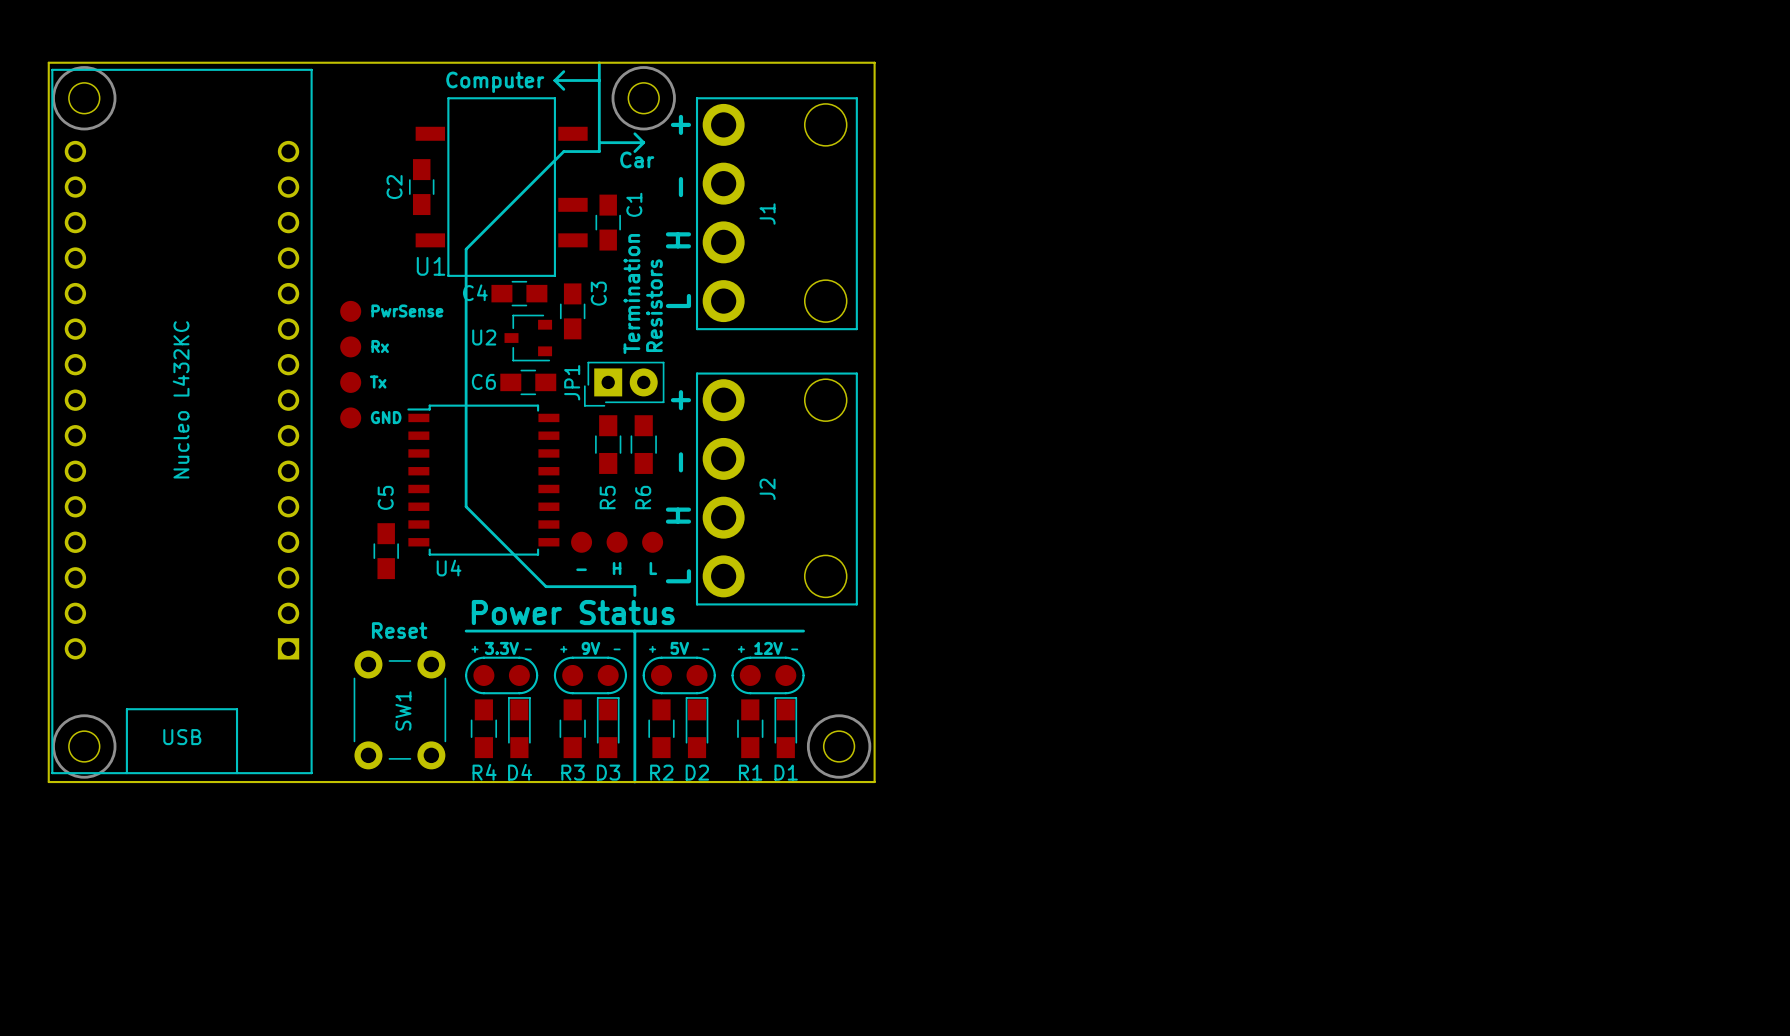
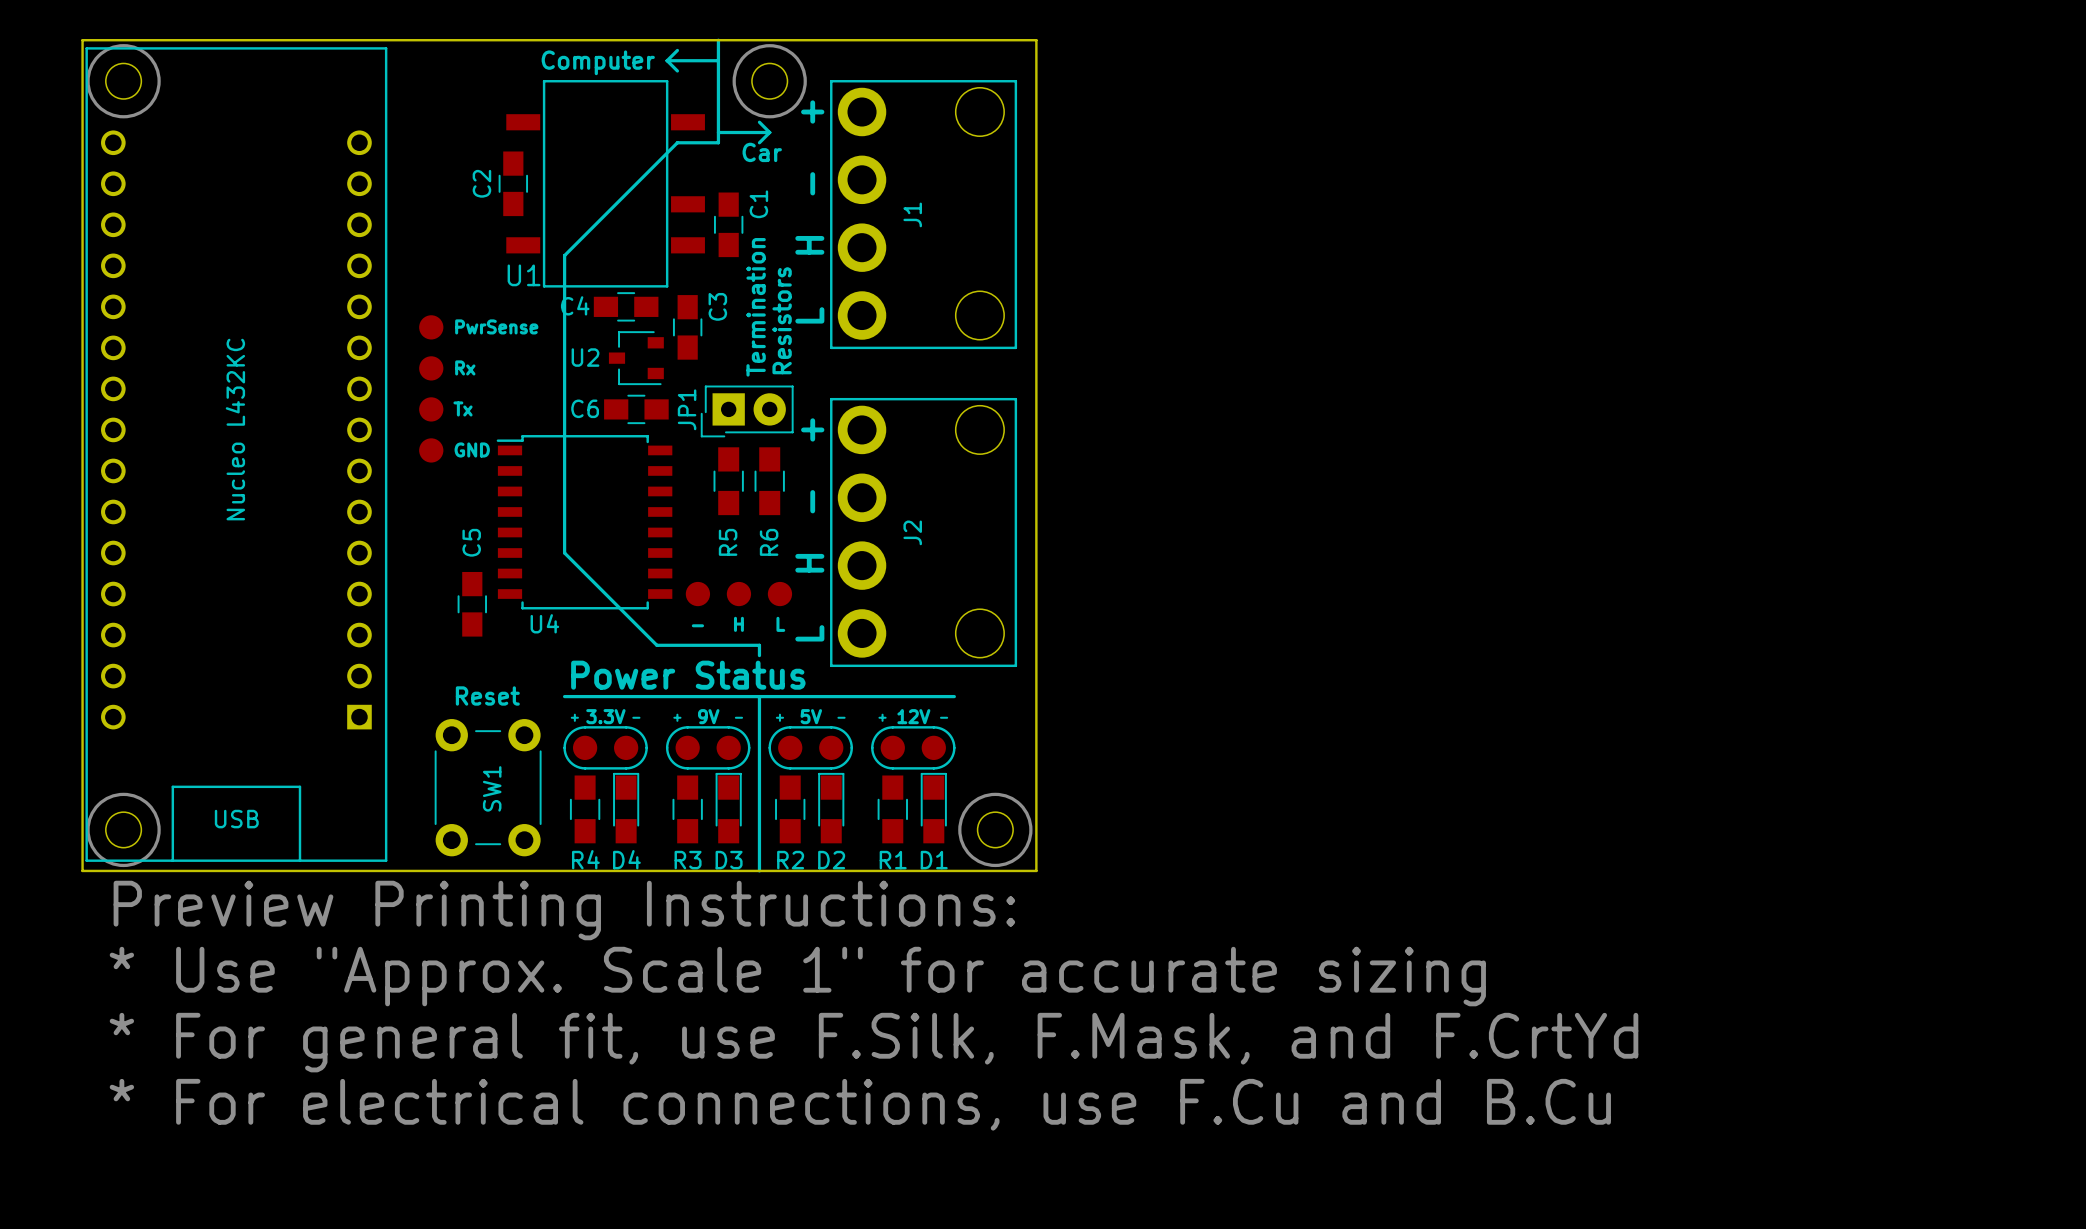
text: none -> Preview Printing Instructions: (564, 910)
text: none -> * Use "Approx. Scale 1" for accurate sizing (797, 976)
text: none -> * For general fit, use F.Silk, F.Mask, and F.CrtYd (874, 1042)
text: none -> * For electrical connections, use F.Cu and B.Cu (860, 1104)

